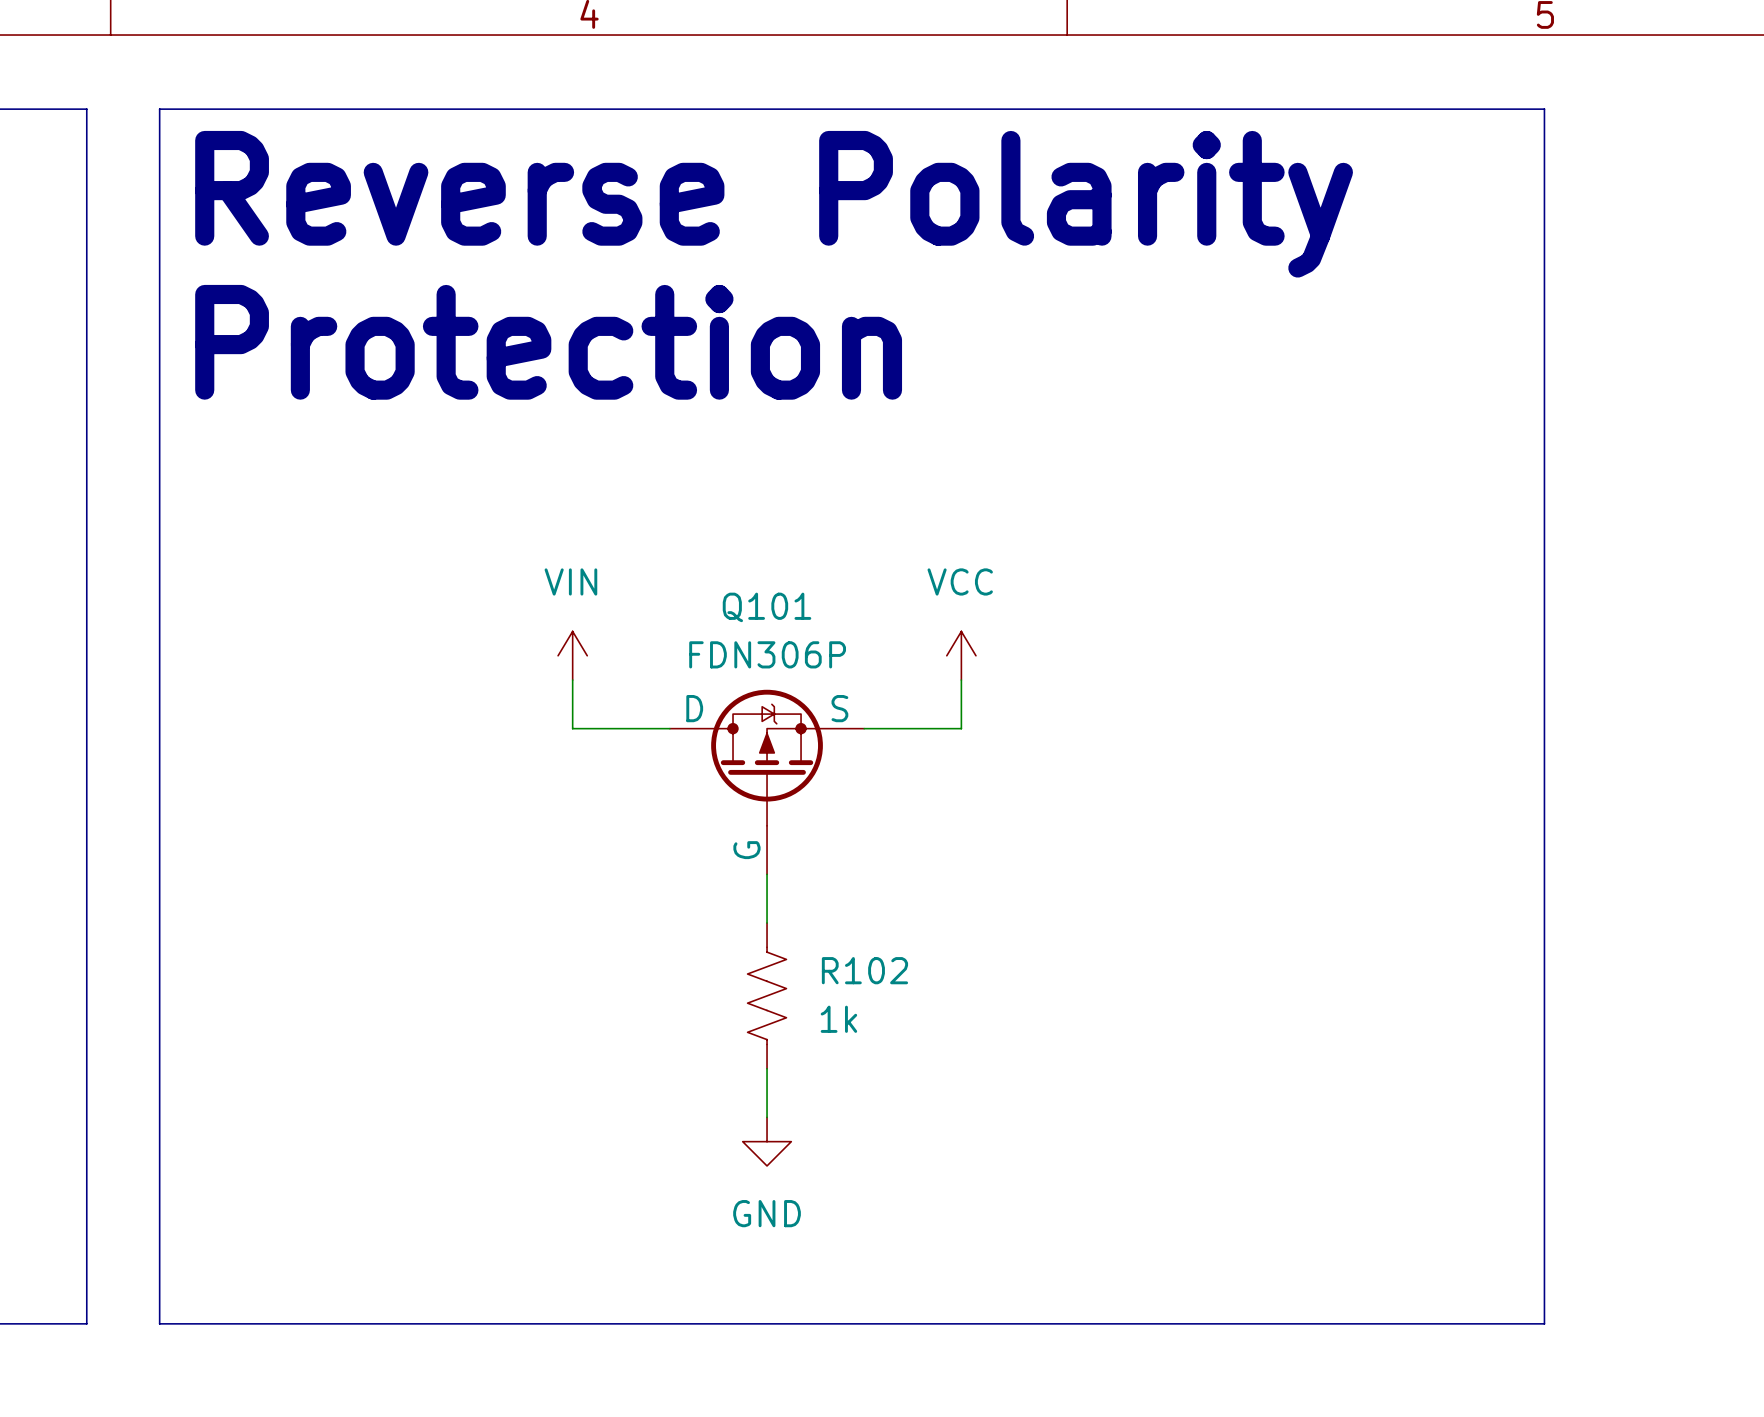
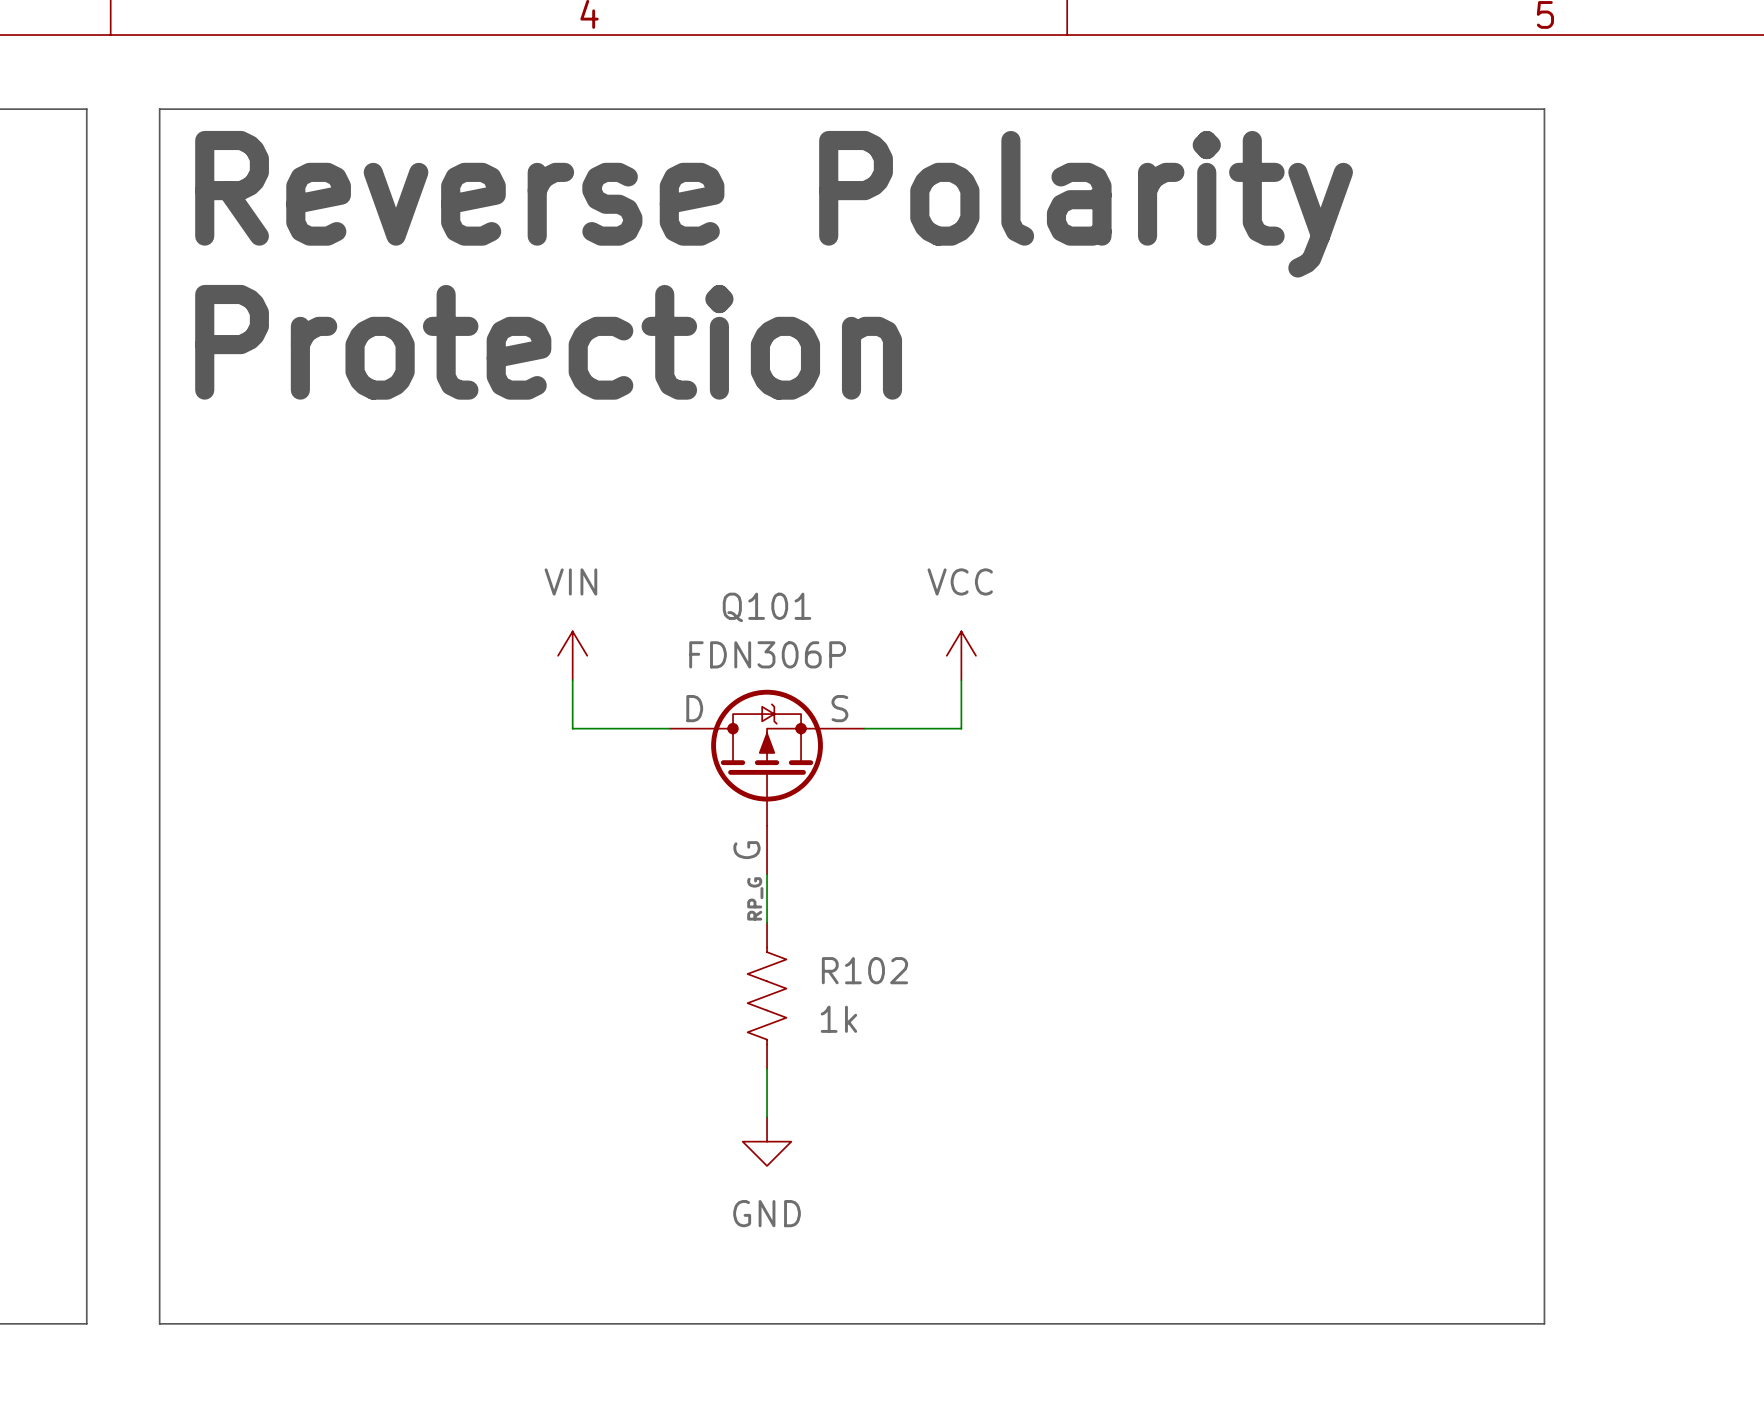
label: none -> RP_G (755, 898)

